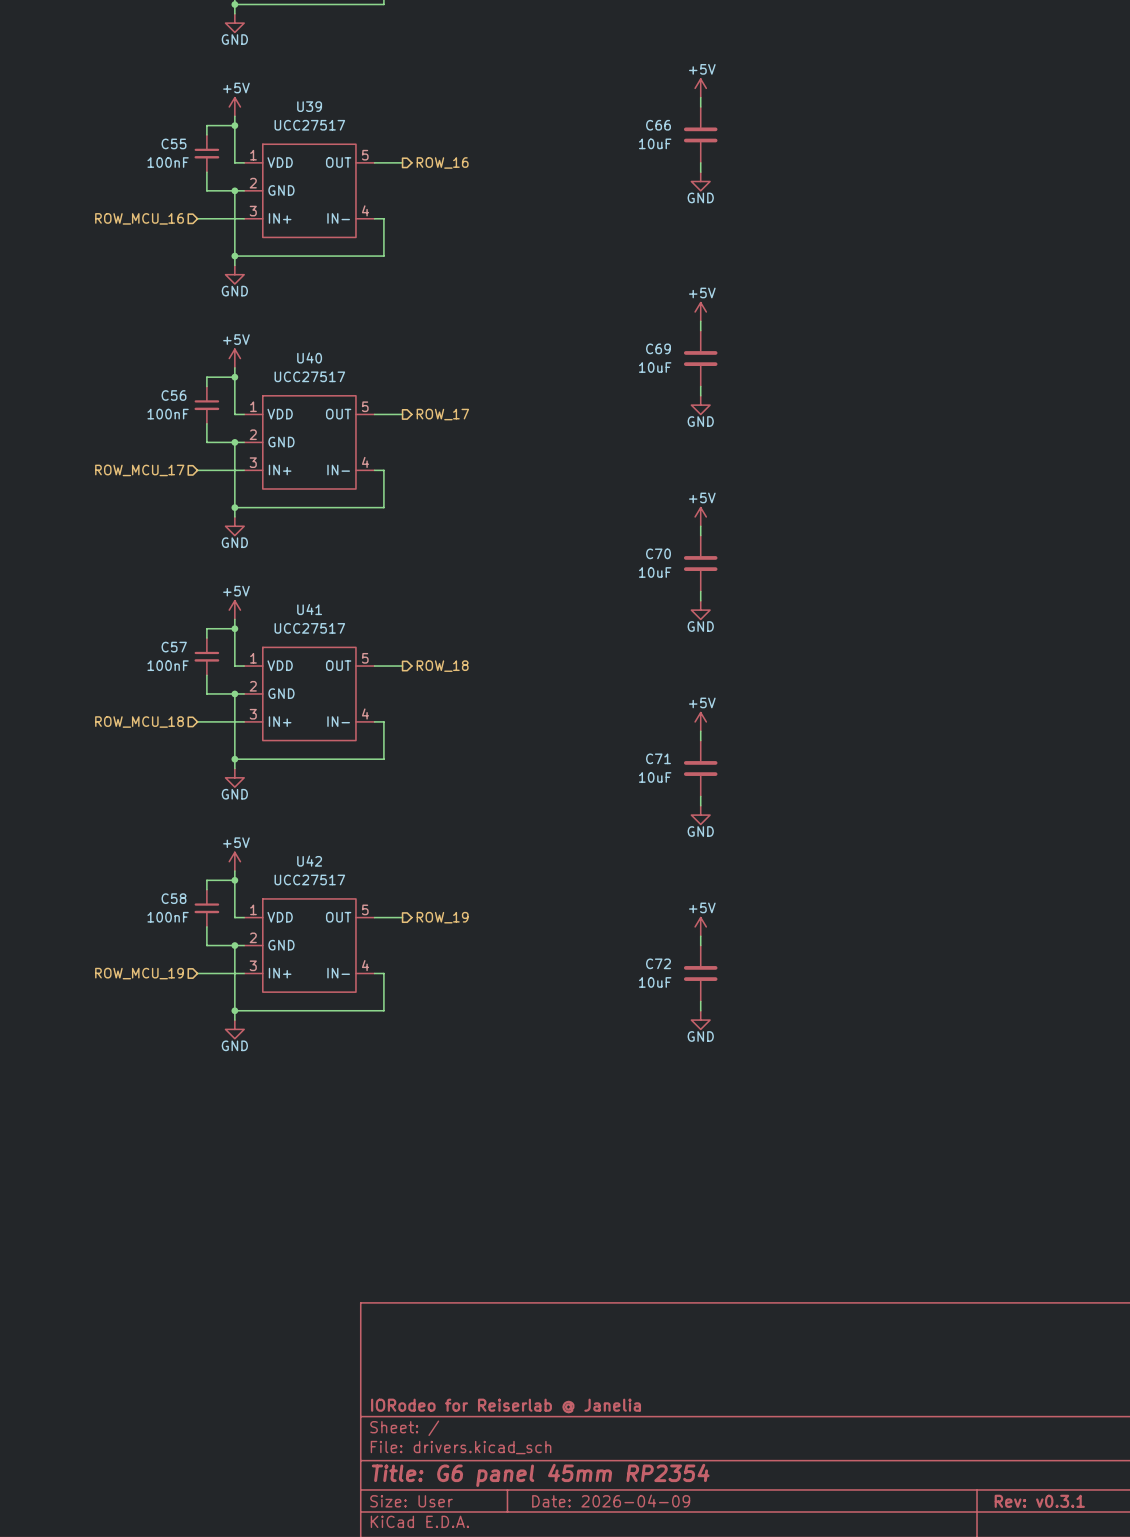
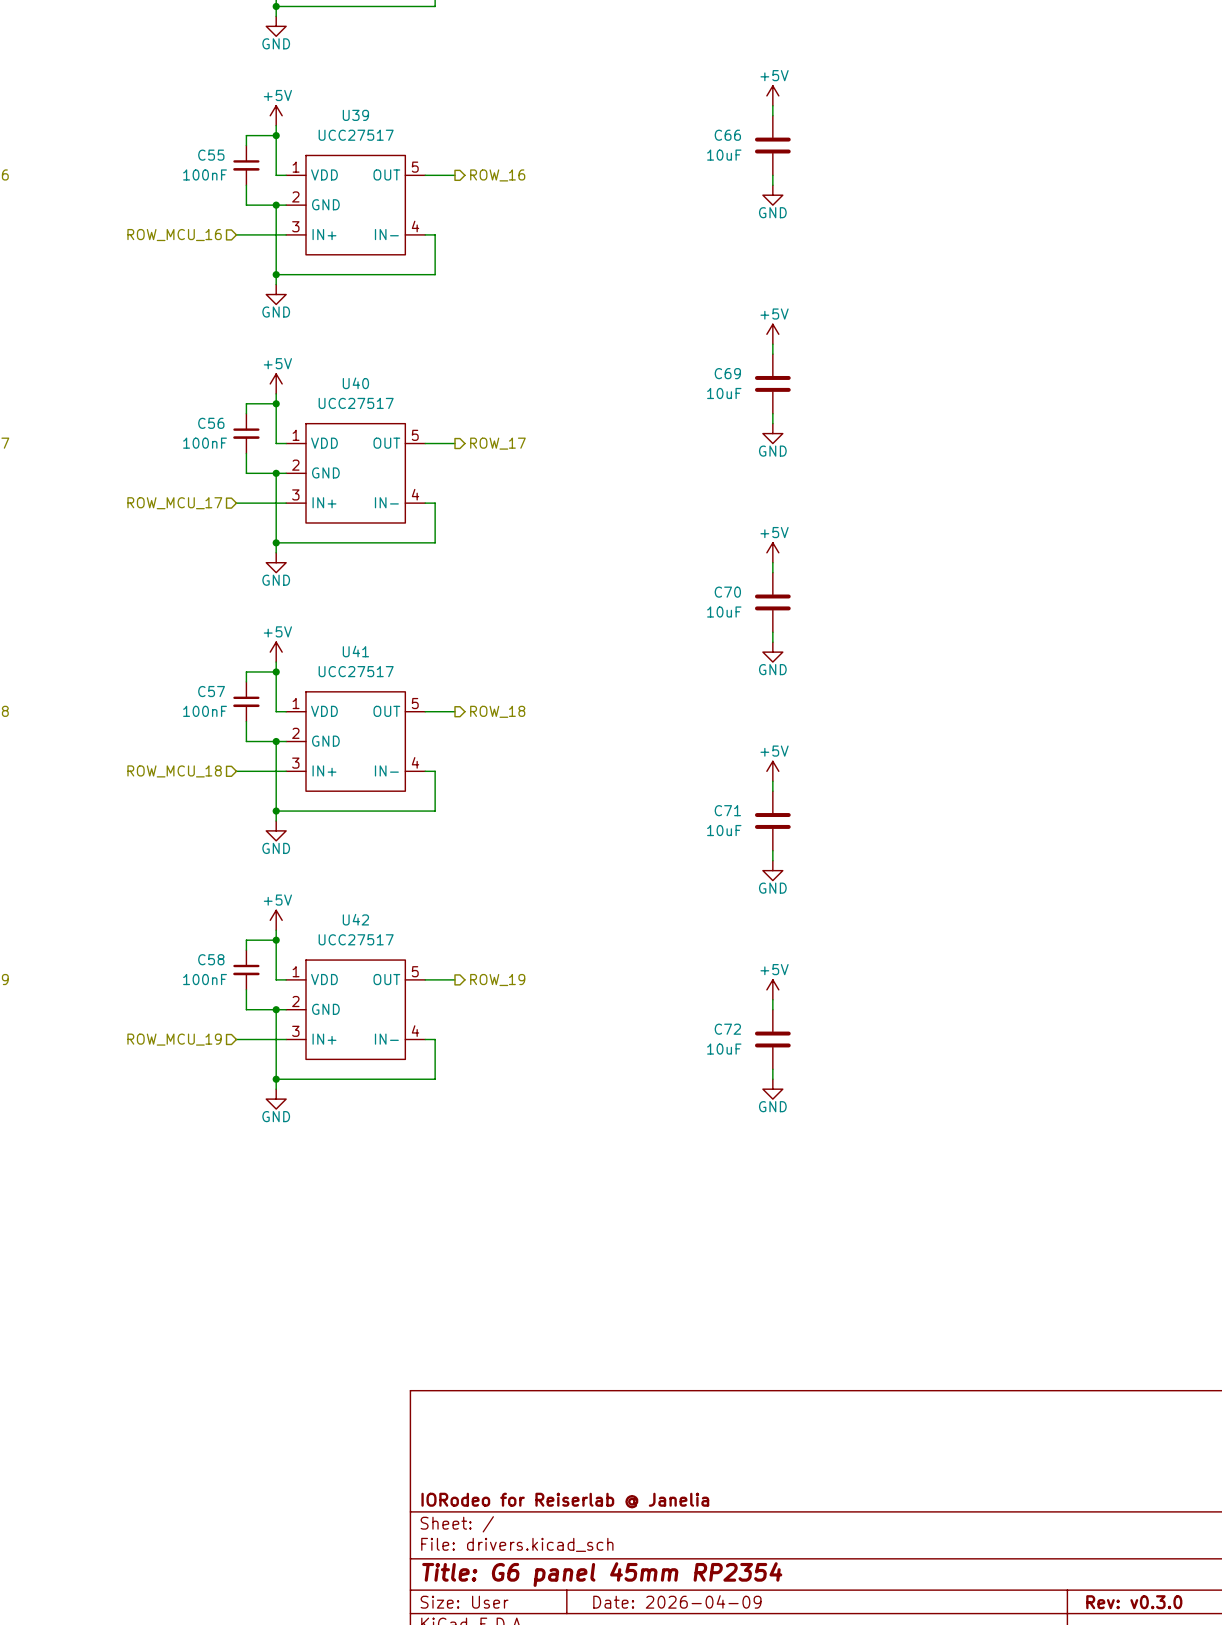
title block: Rev: v0.3.1 (1039, 1501) -> Rev: v0.3.0 (1134, 1602)

